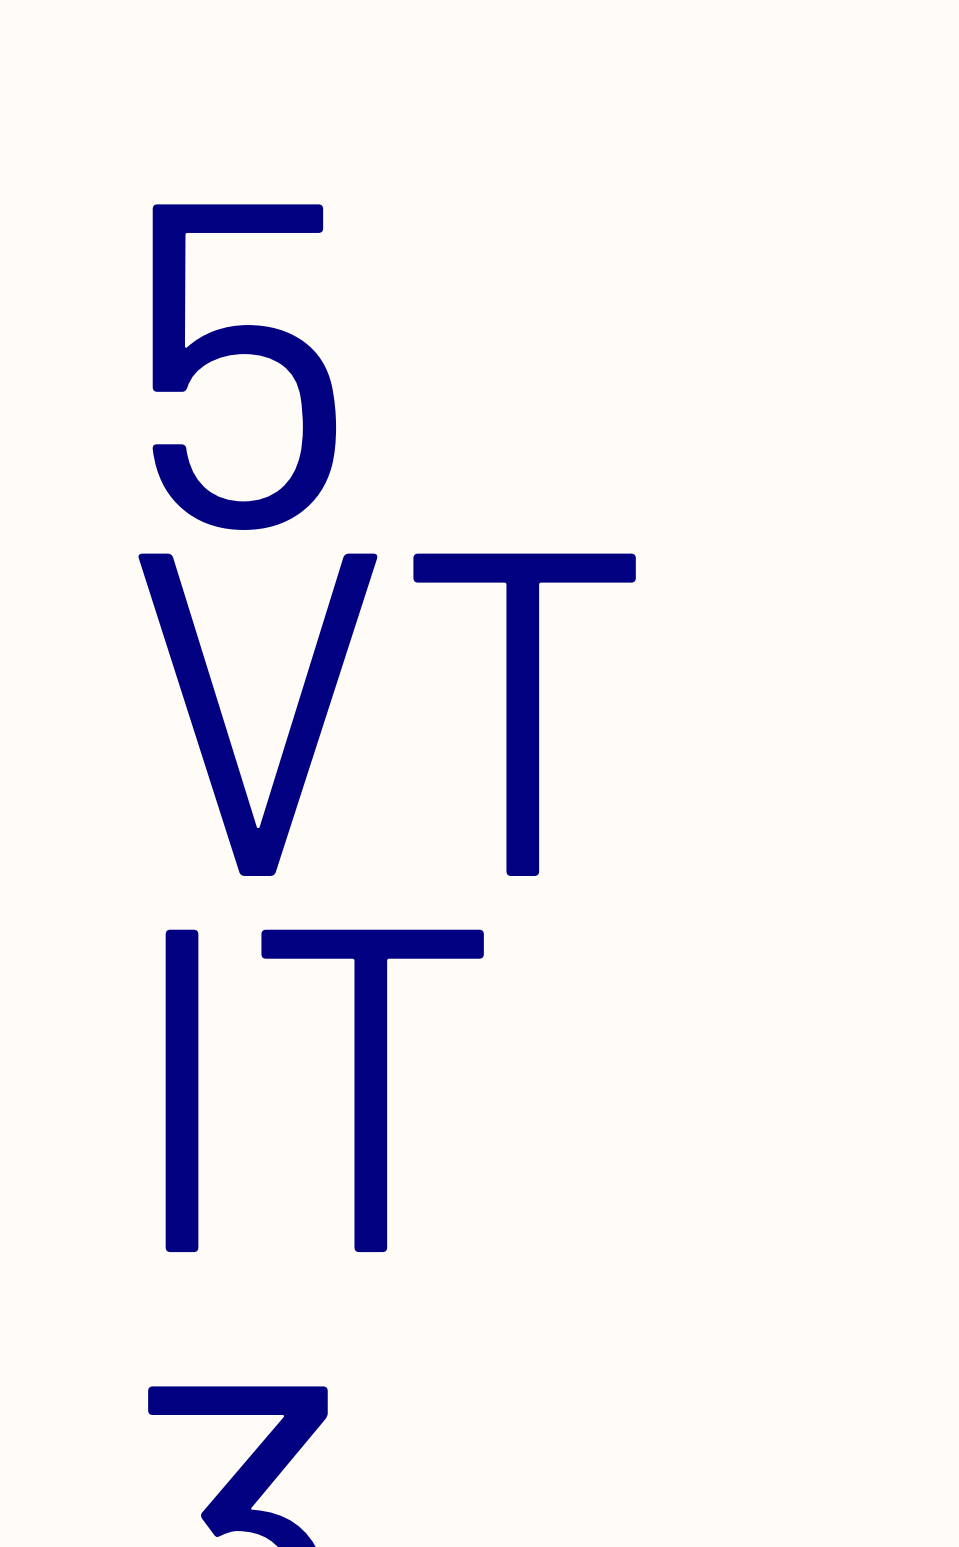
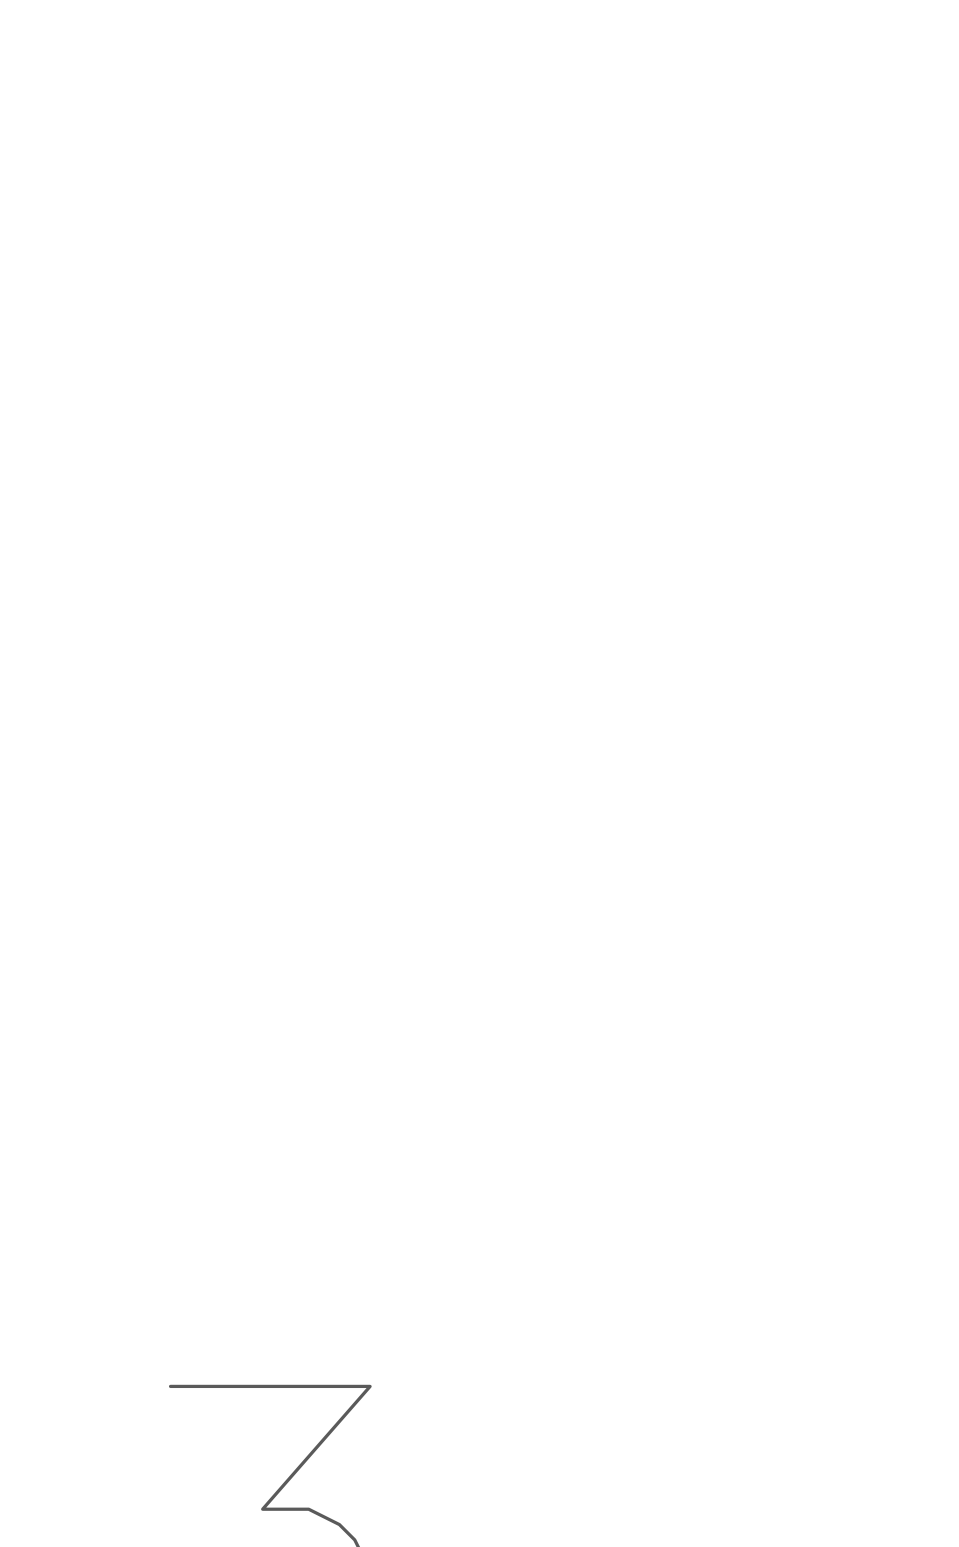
text: 5 (244, 367) -> none
text: VT (387, 714) -> none
text: IT (324, 1090) -> none

